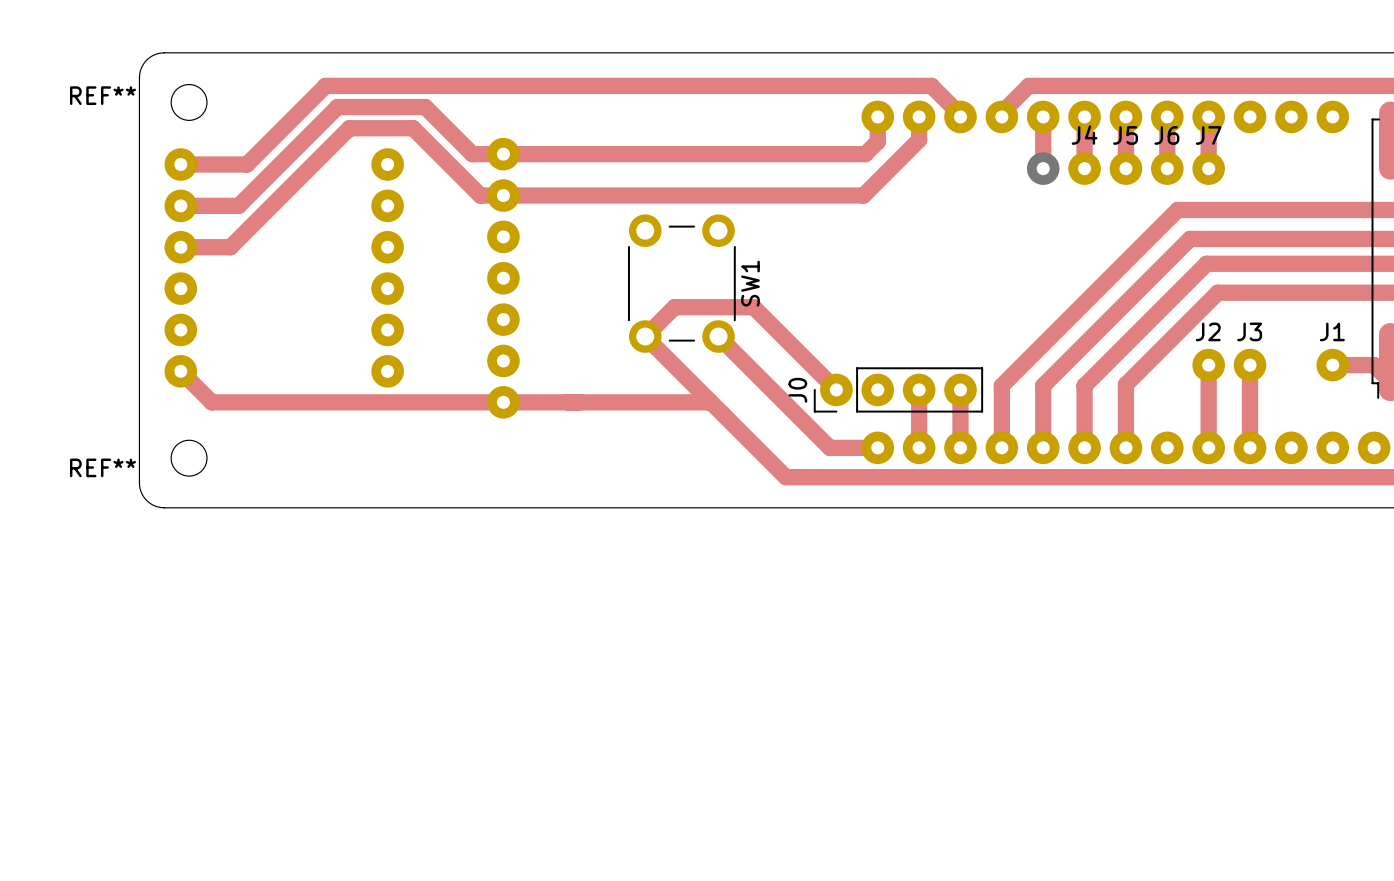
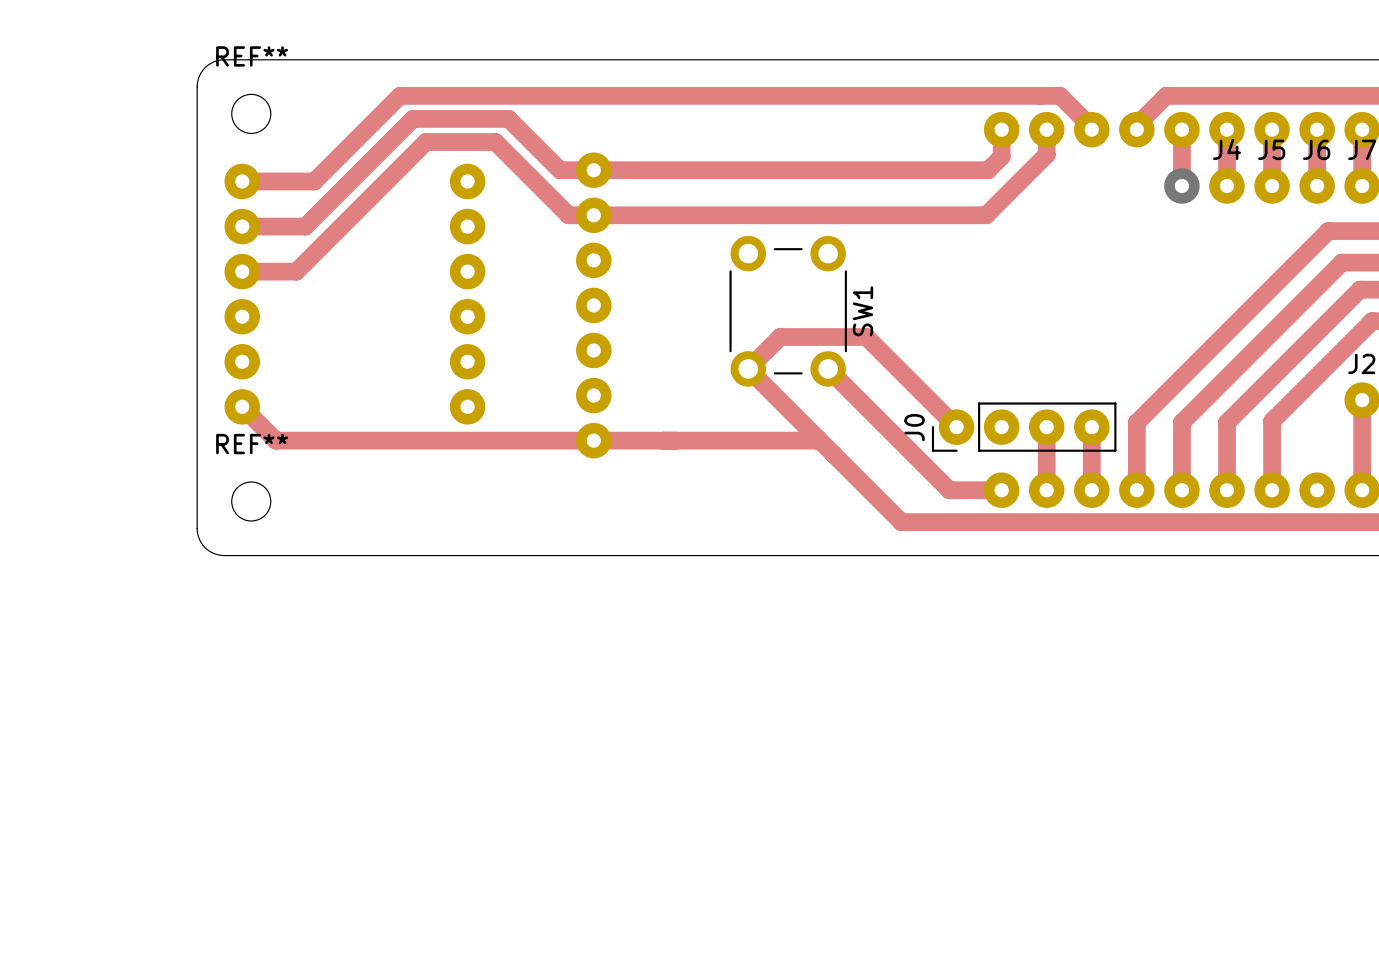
REF** name position: REF** (102, 95) -> REF** (252, 56)
REF** name position: REF** (102, 467) -> REF** (252, 444)

